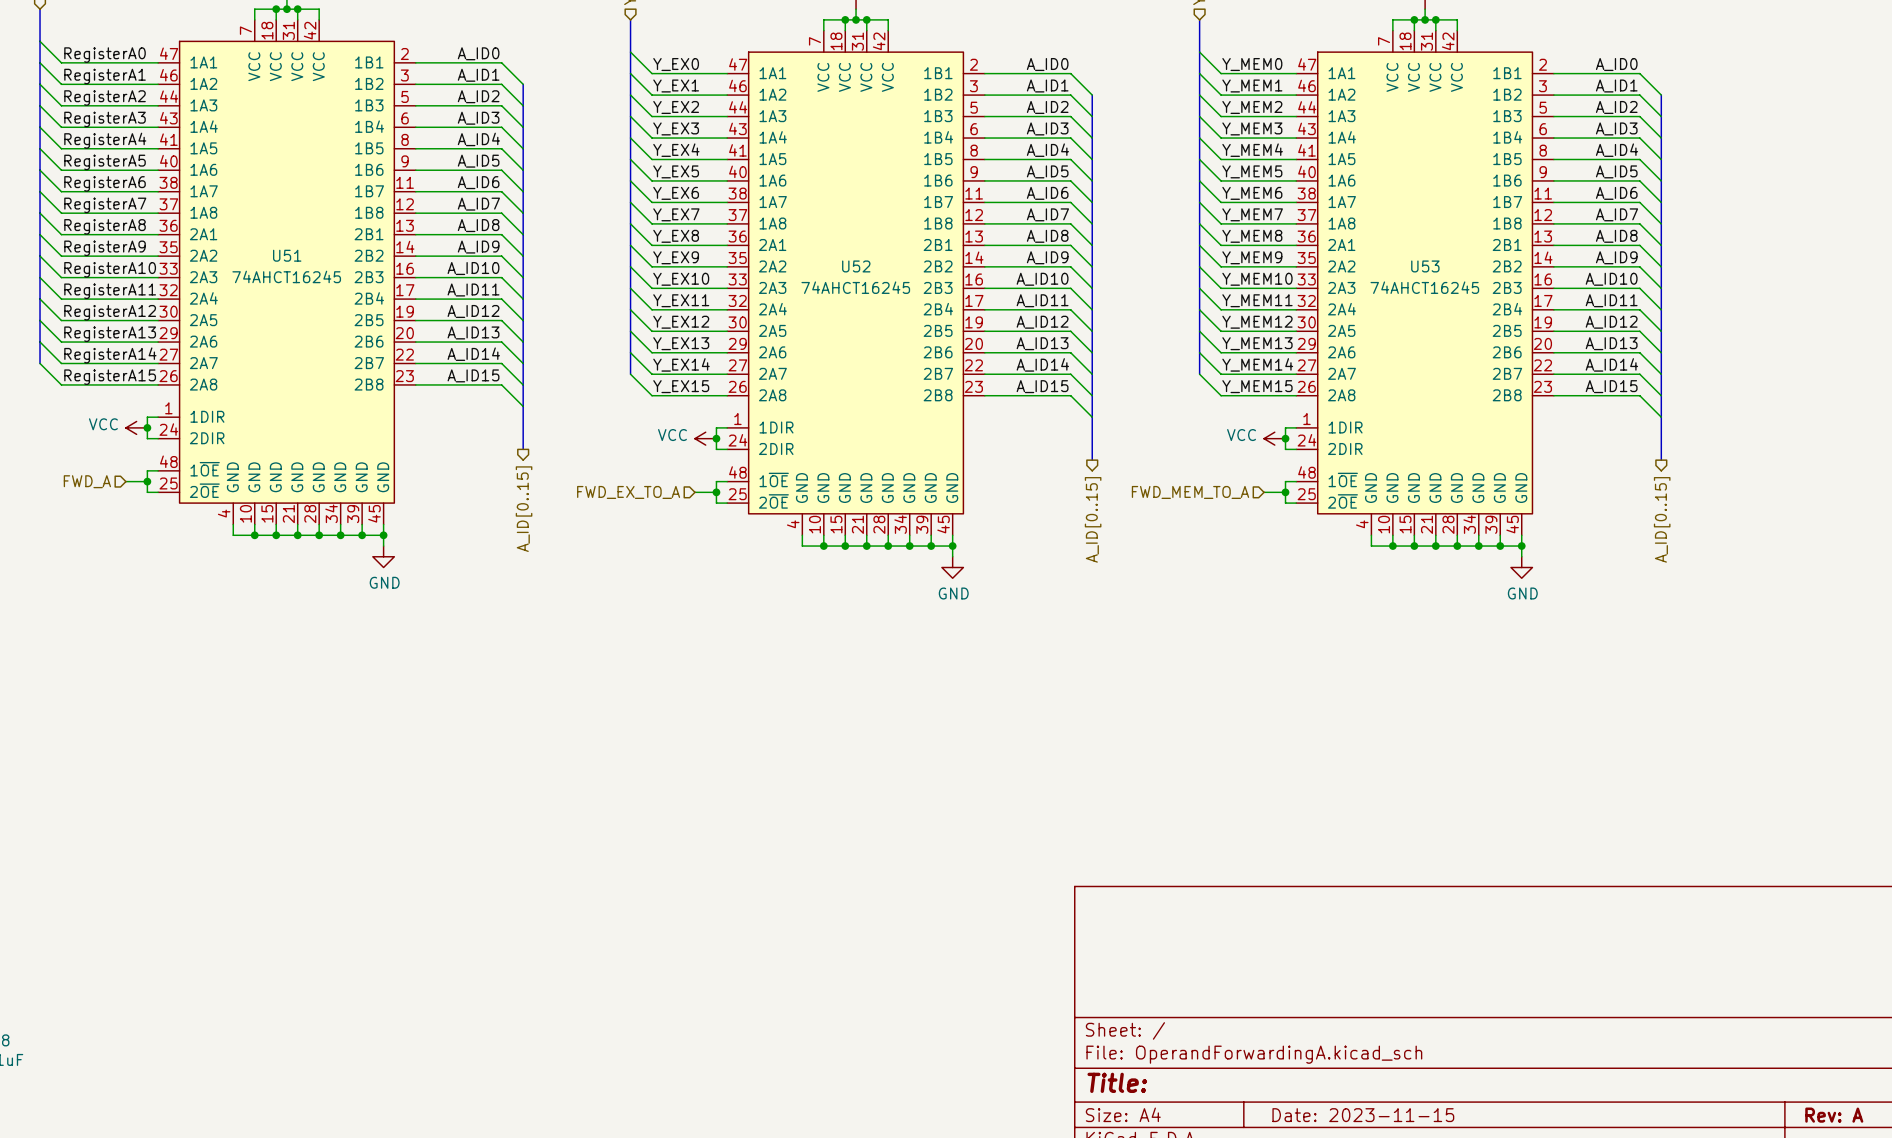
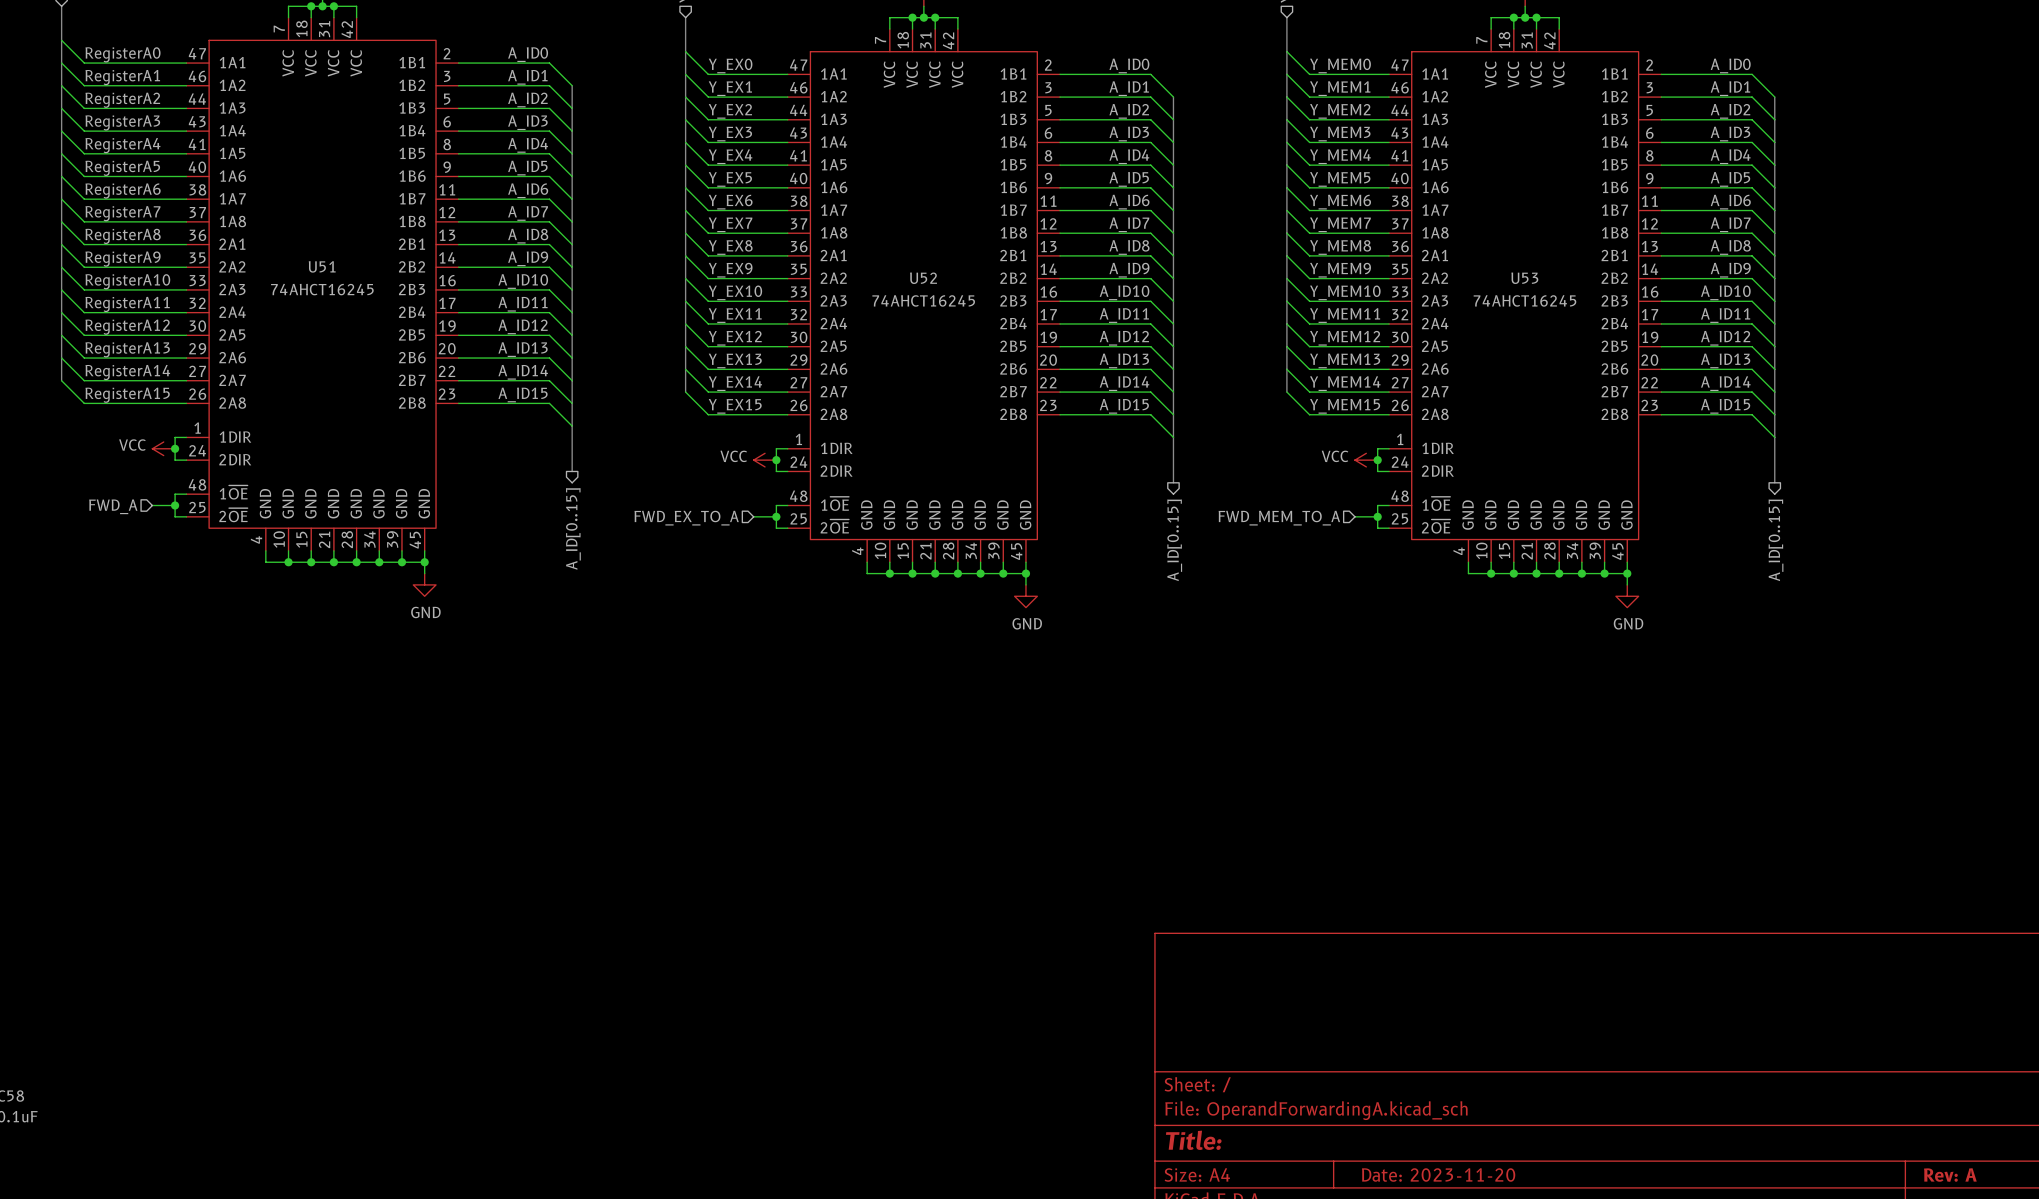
title block: Date: 2023-11-15 (1363, 1115) -> Date: 2023-11-20 (1438, 1174)

